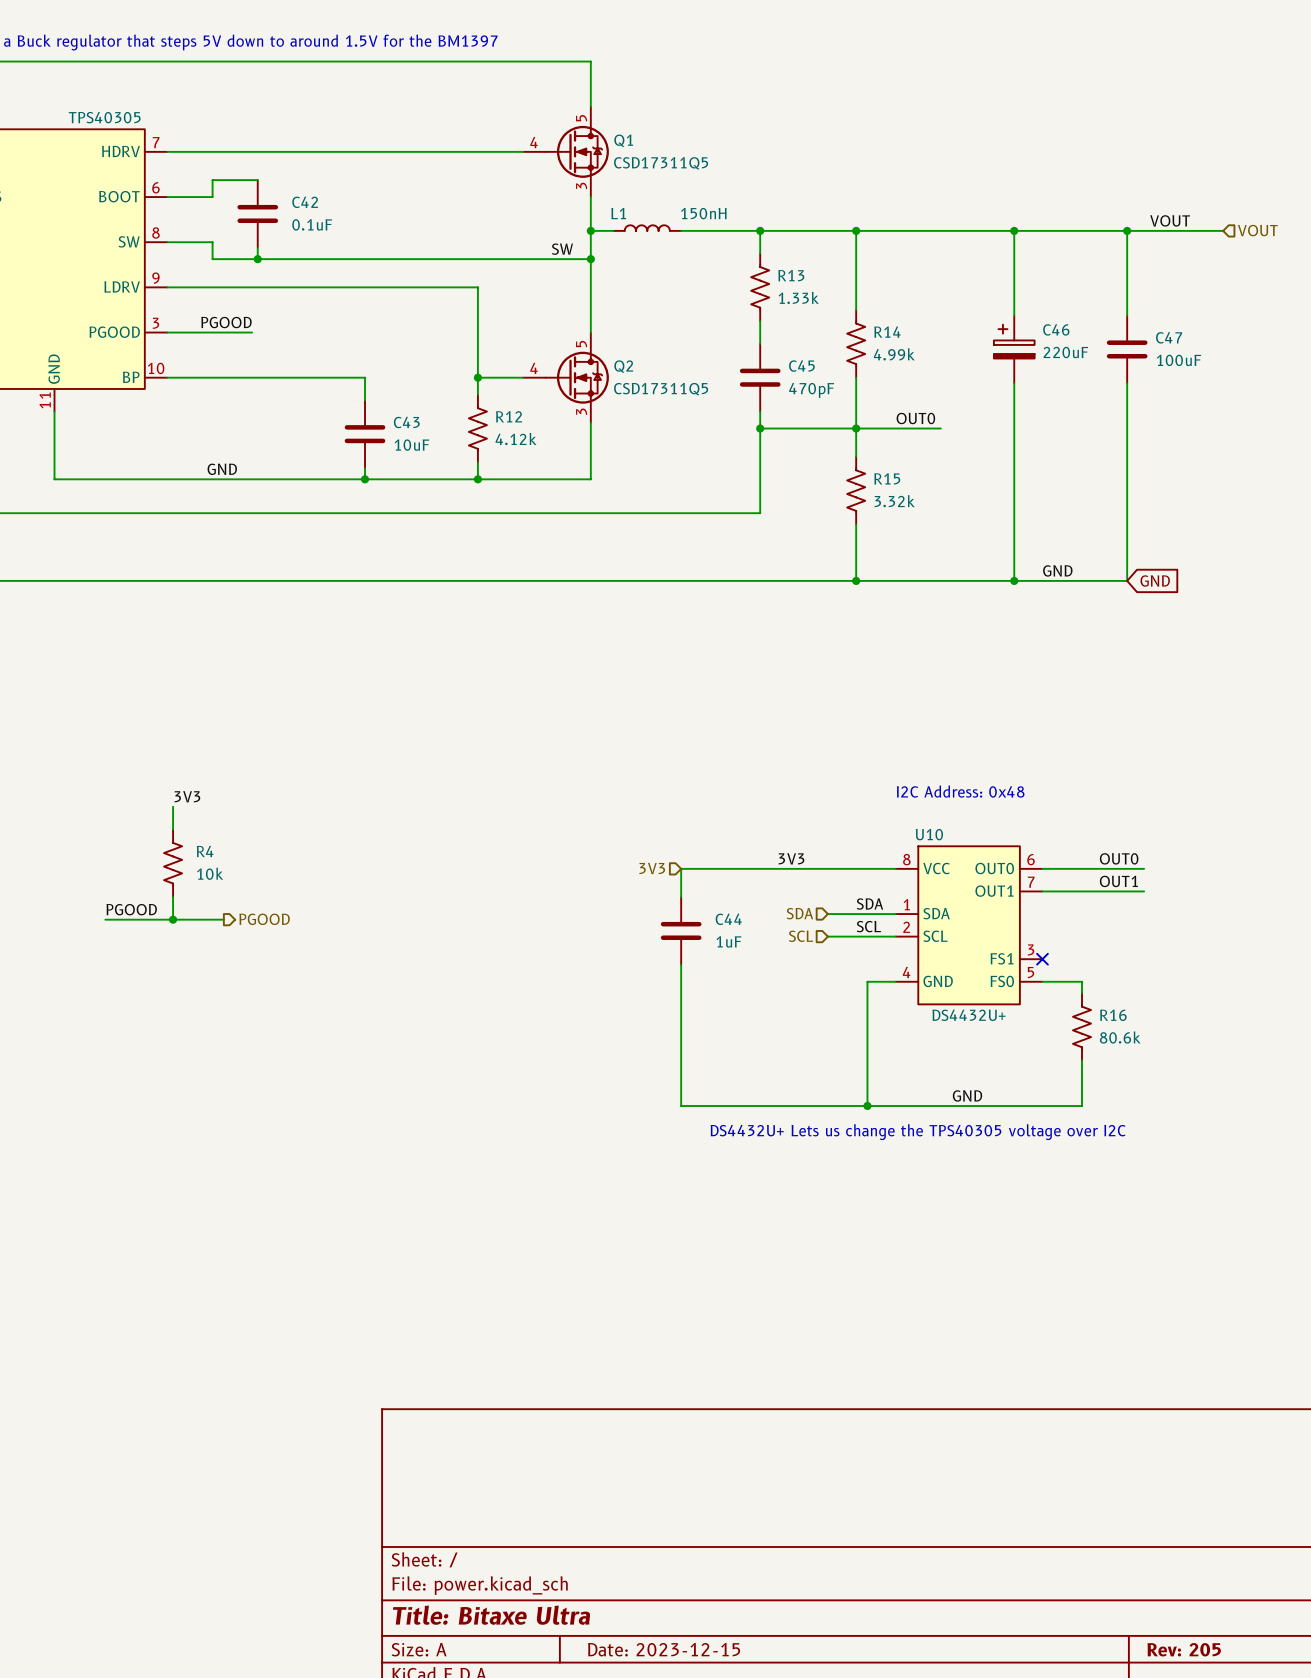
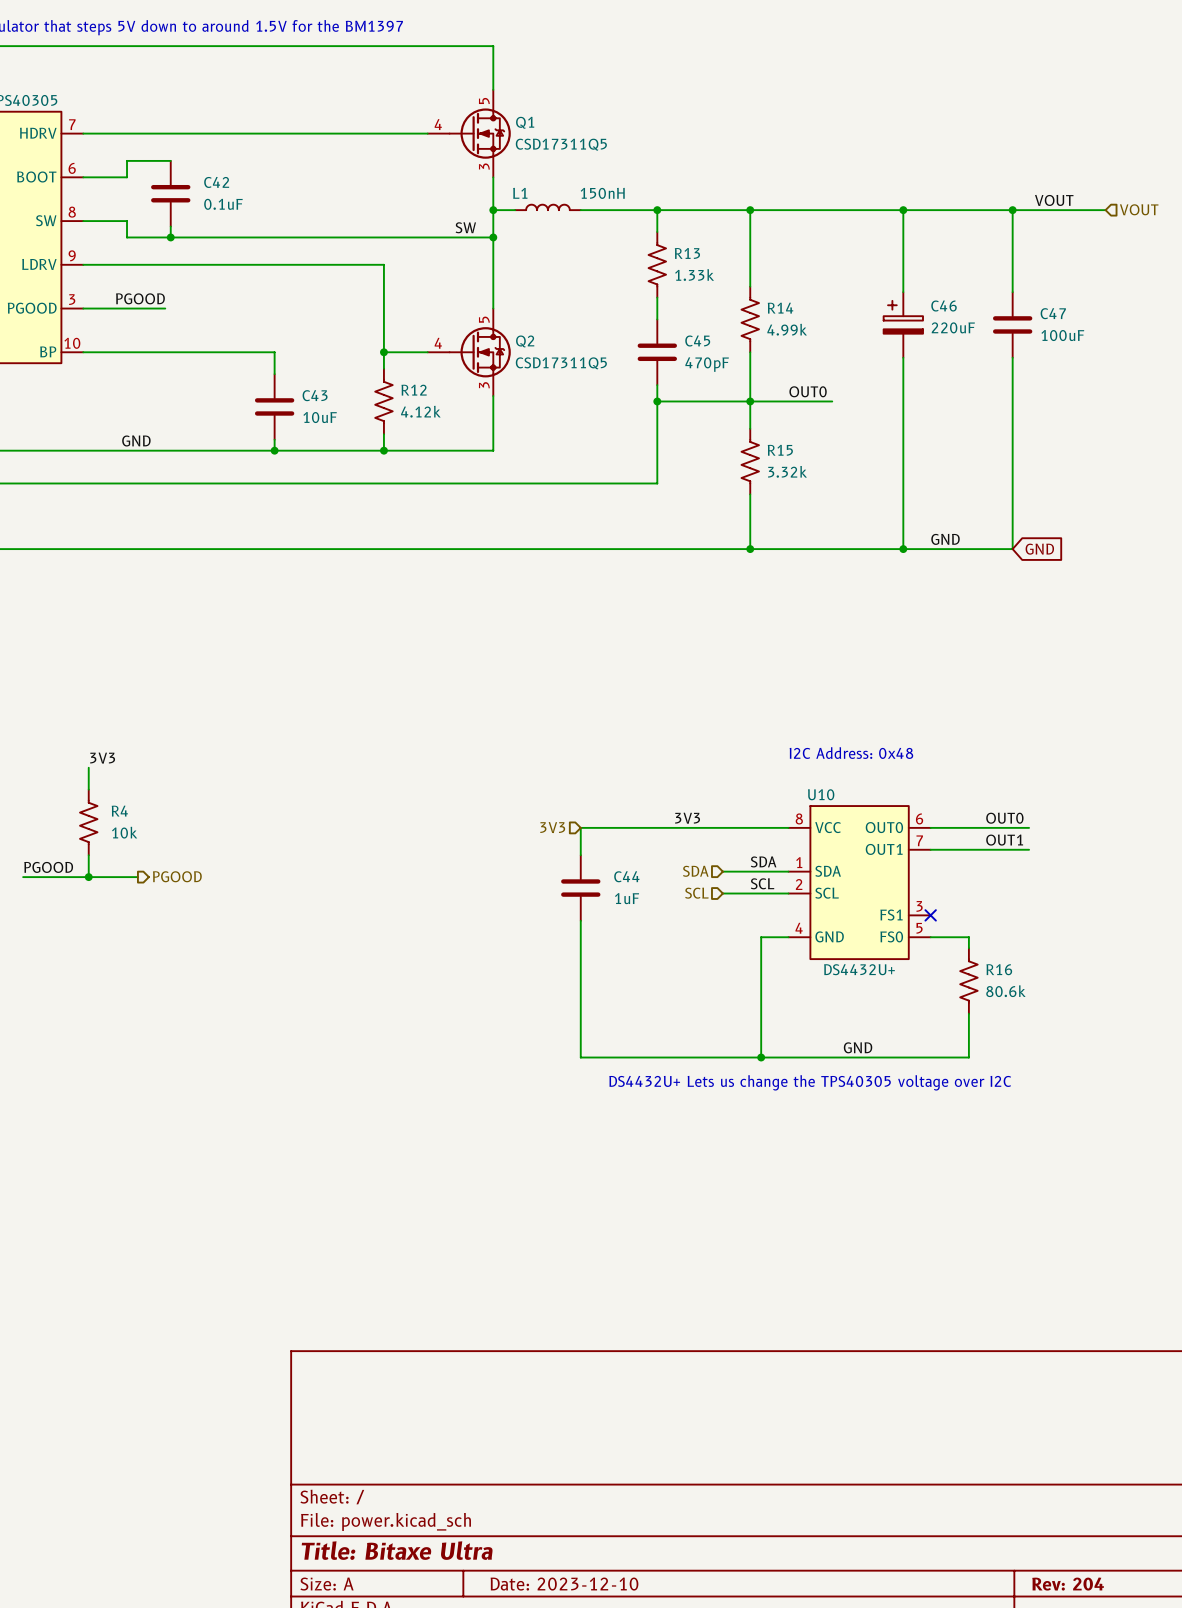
title block: Date: 2023-12-15 (664, 1649) -> Date: 2023-12-10 (564, 1584)
title block: Rev: 205 (1184, 1649) -> Rev: 204 (1068, 1584)

